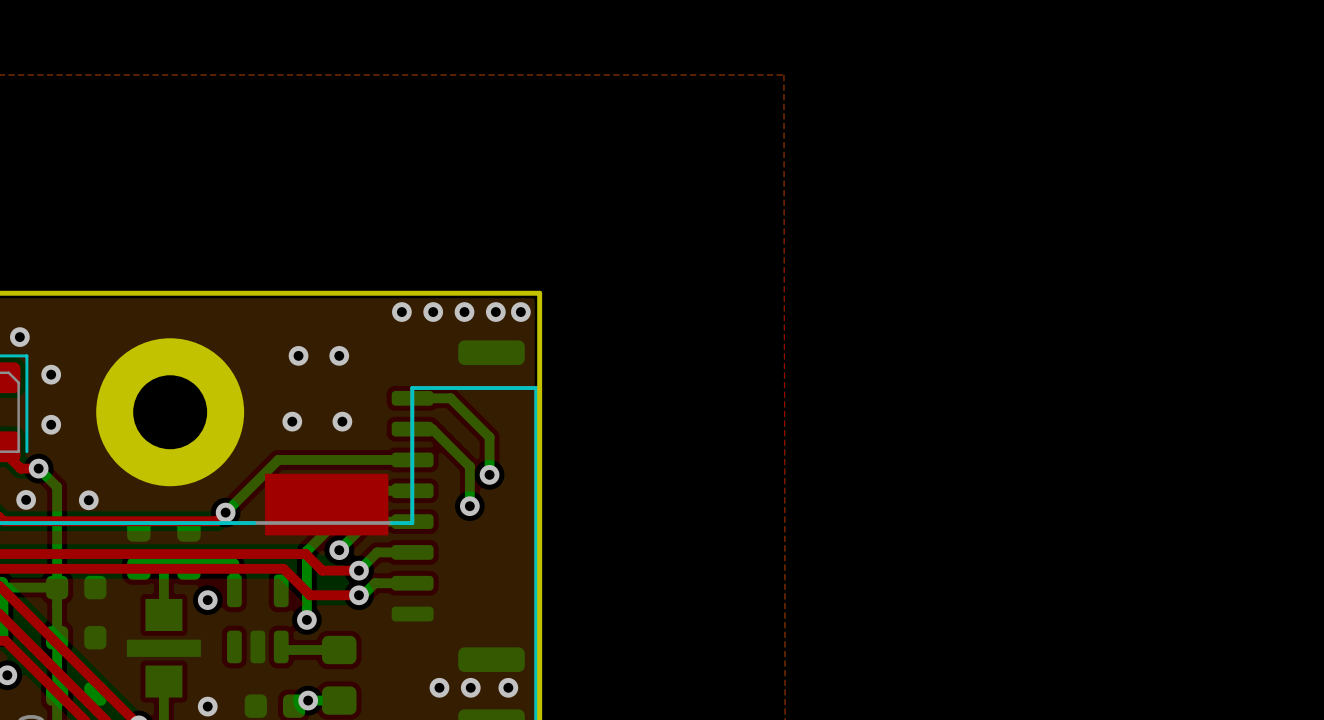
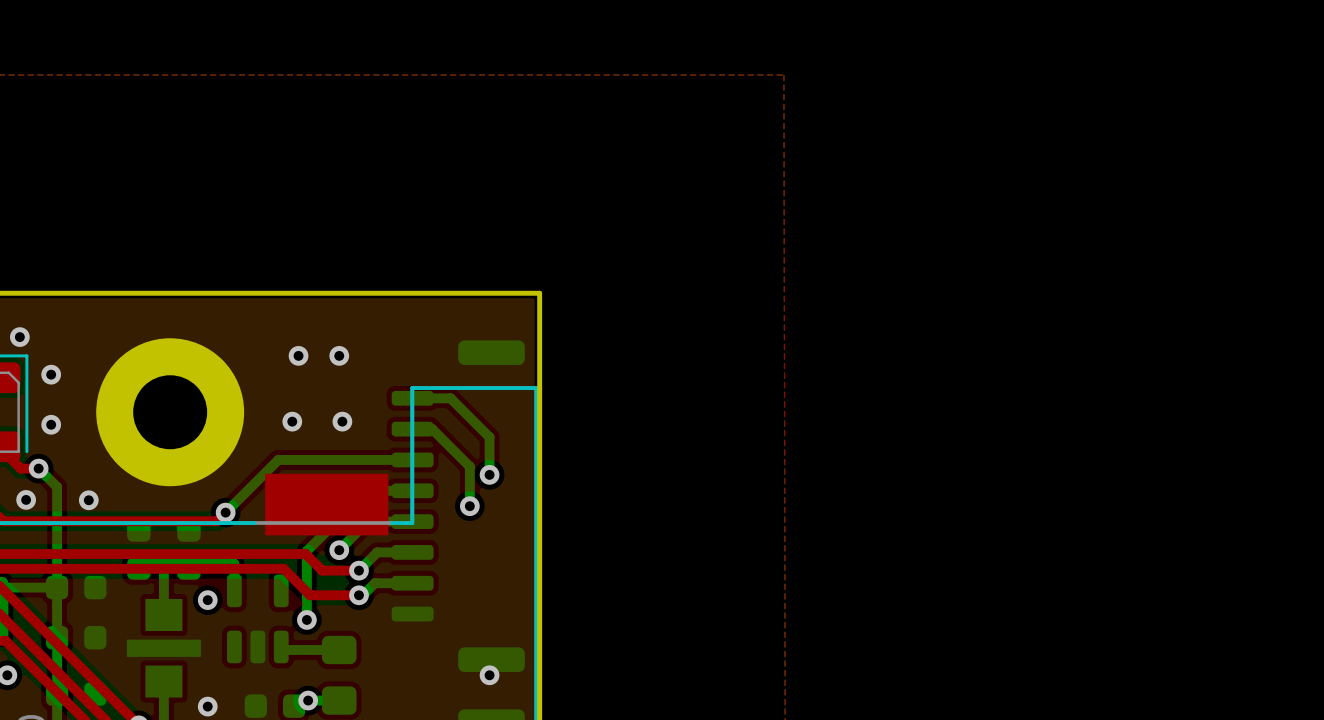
via: (401, 312) -> none
via: (433, 312) -> none
via: (464, 312) -> none
via: (495, 312) -> none
via: (520, 312) -> none
via: none -> (489, 675)
via: (439, 687) -> none
via: (470, 687) -> none
via: (508, 687) -> none

